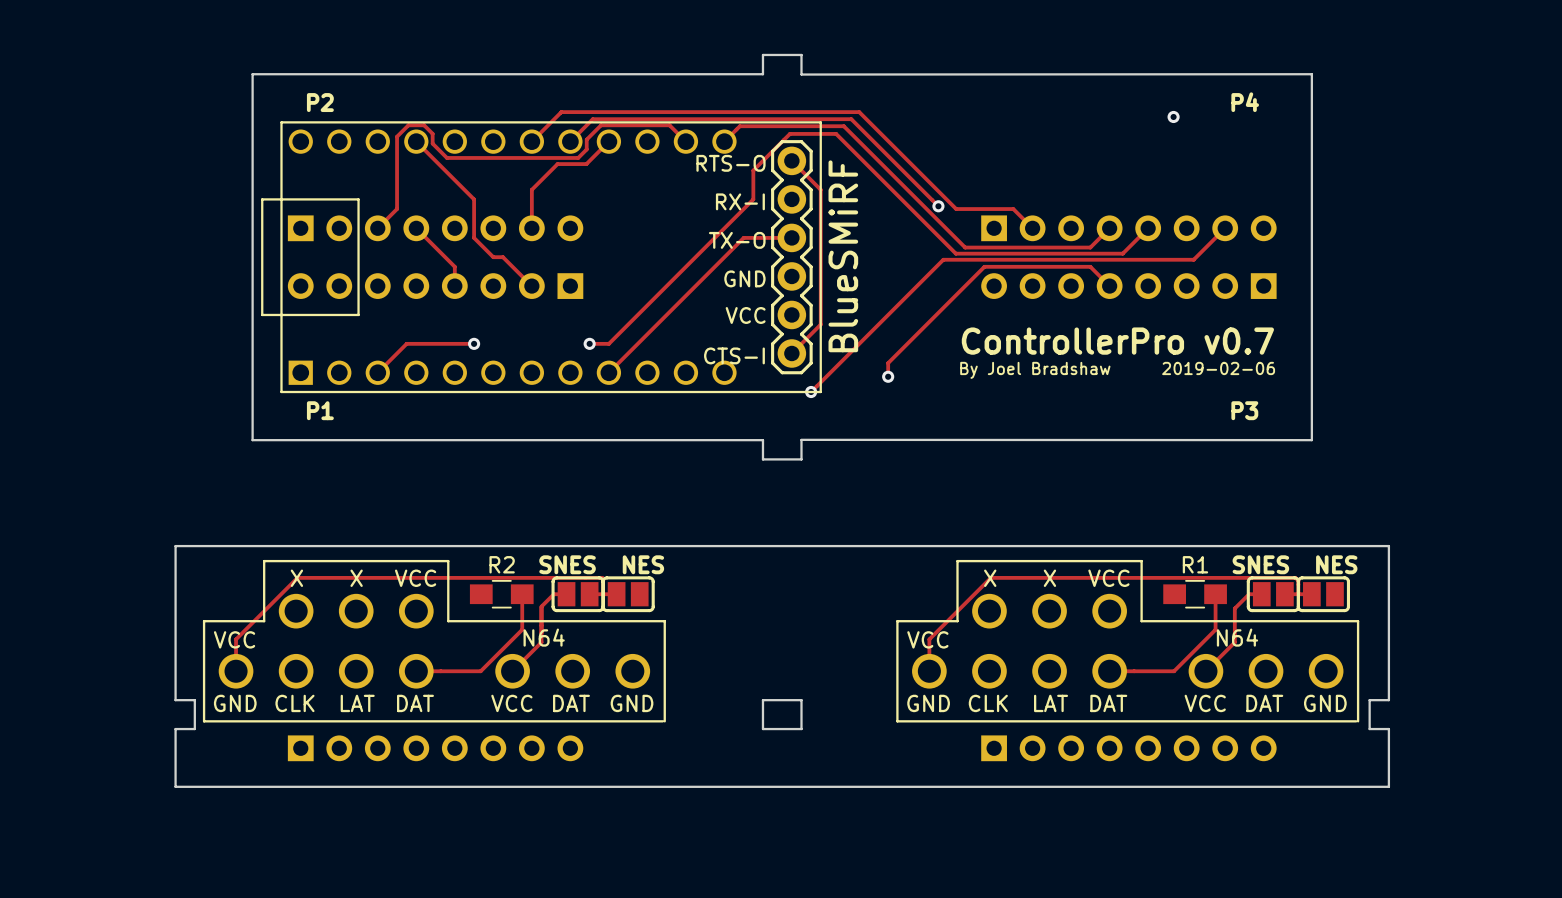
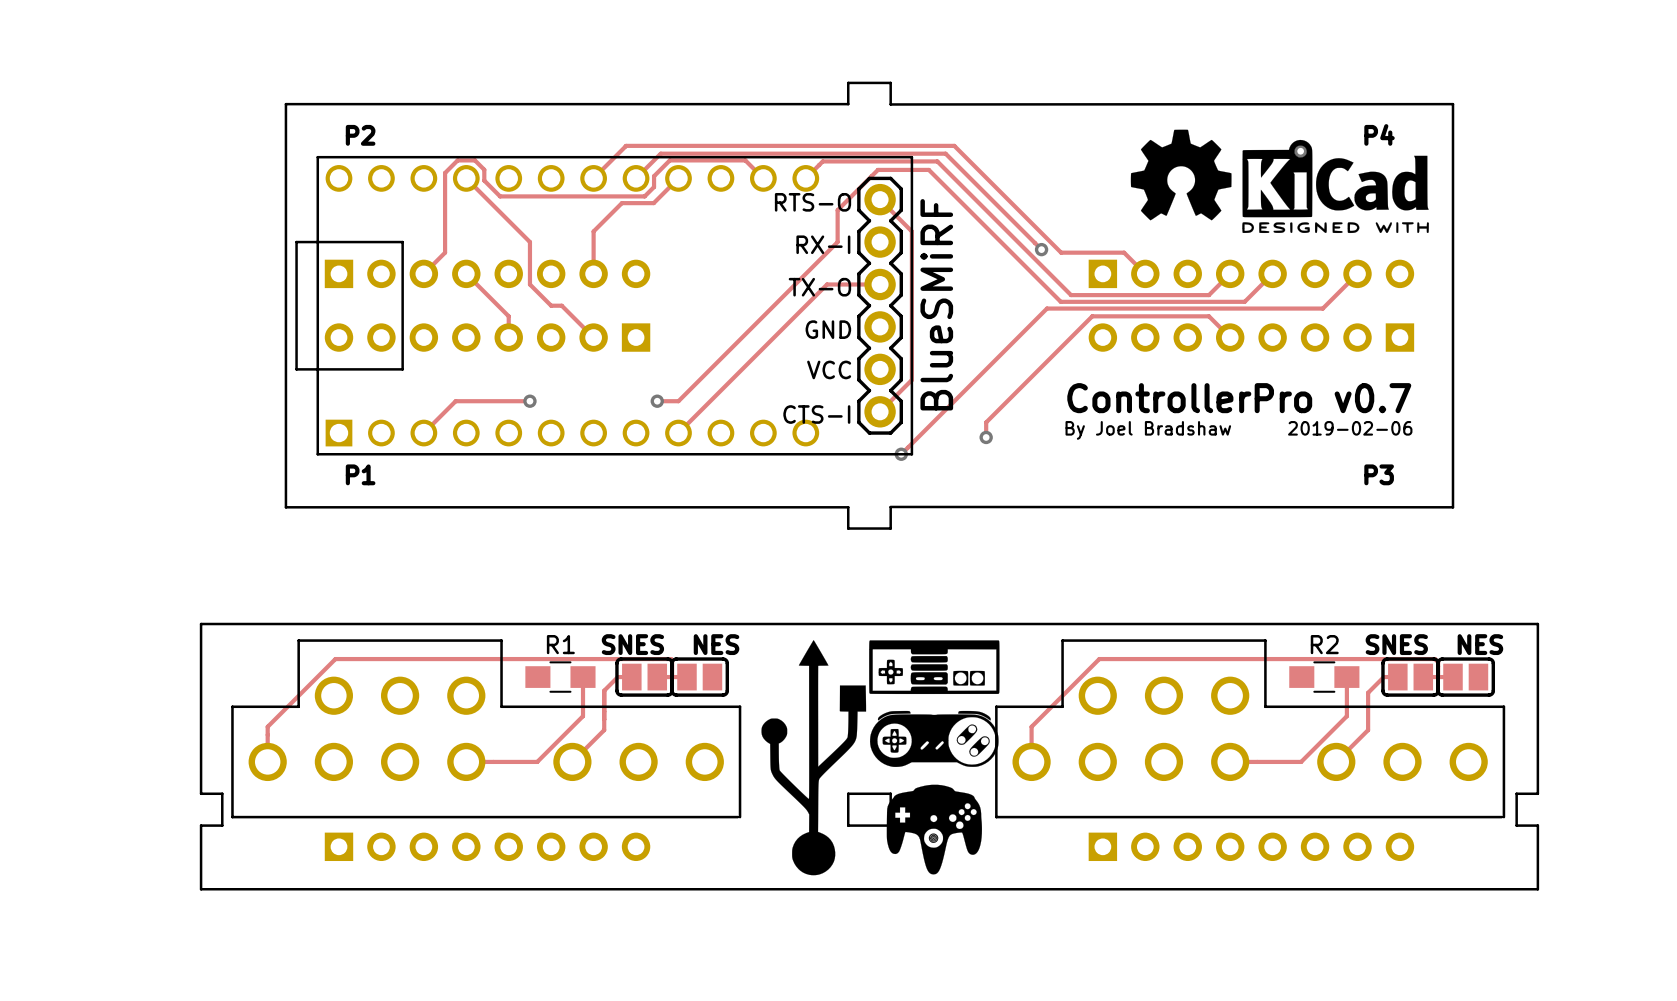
drawing: none -> [1130, 129, 1429, 234]
part footprint: [202, 559, 666, 723] -> [231, 639, 742, 819]
part footprint: [896, 559, 1360, 723] -> [995, 639, 1506, 819]
drawing: none -> [761, 640, 1000, 876]
R2 name: R2 (502, 564) -> R1 (560, 644)
R1 name: R1 (1195, 564) -> R2 (1324, 644)

